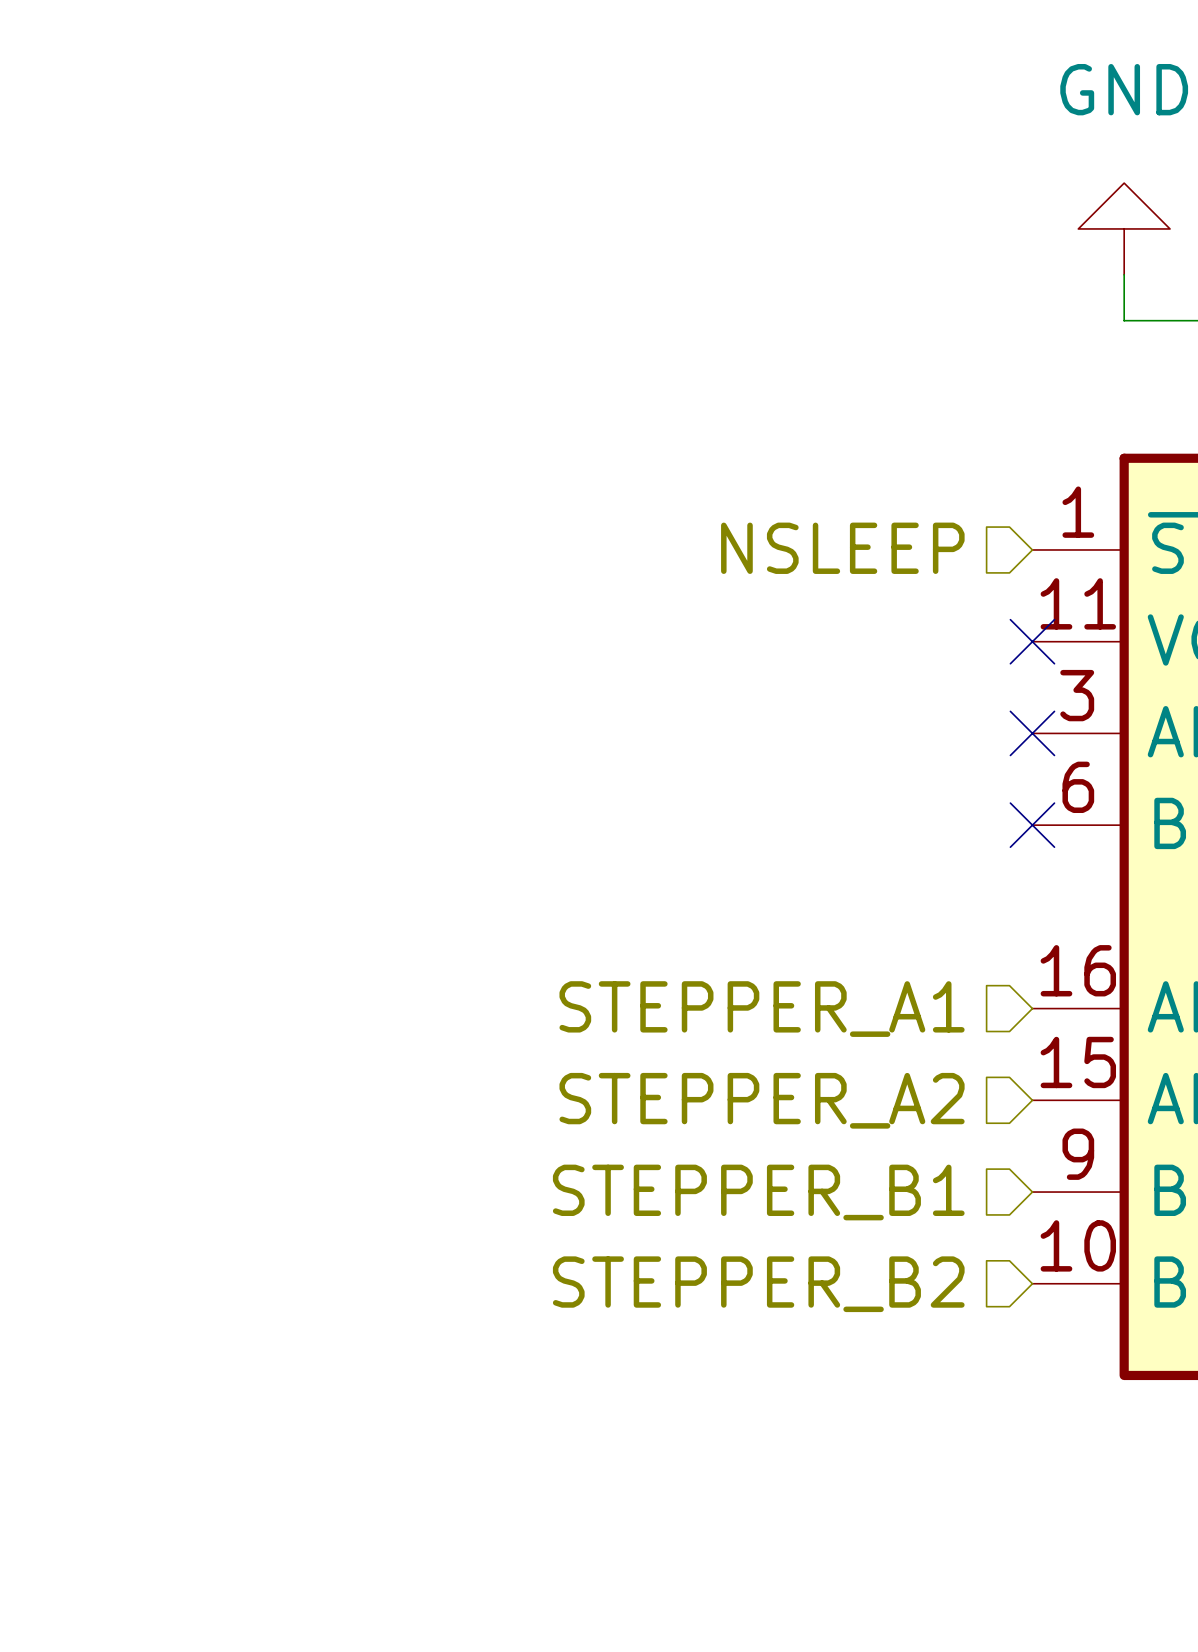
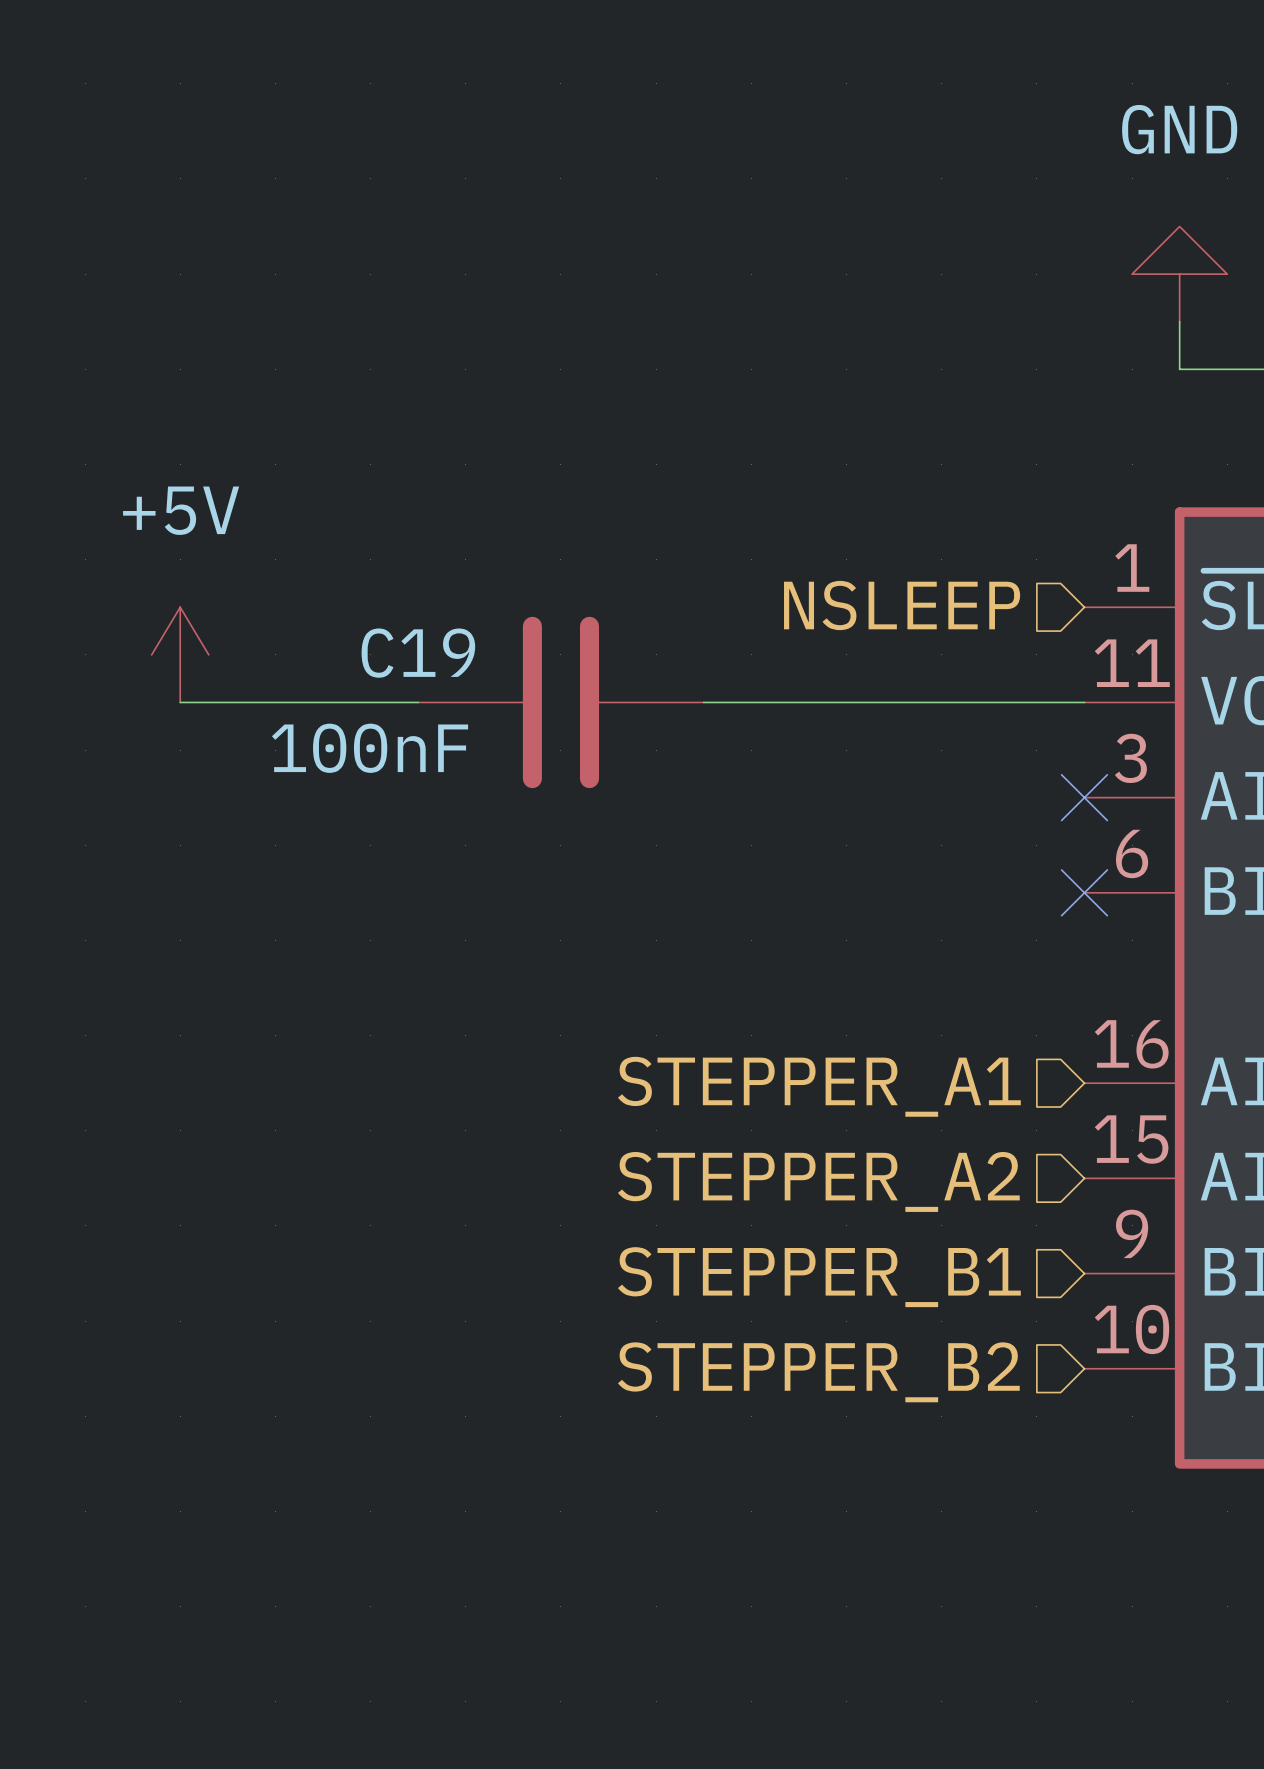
power symbol: none -> +5V (180, 654)
wire: none -> (180, 702) (418, 702)
C19: none -> 100nF (560, 702)
wire: none -> (703, 702) (1084, 702)
no-connect mark: (1032, 641) -> none

